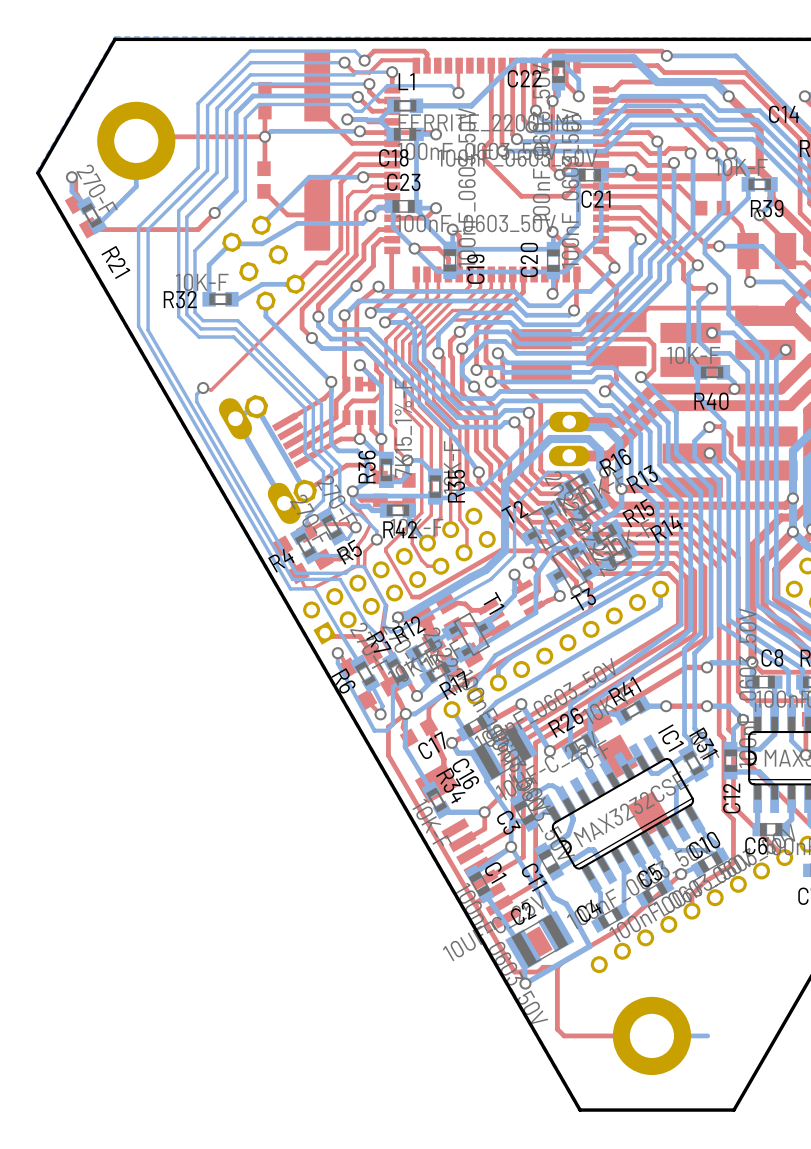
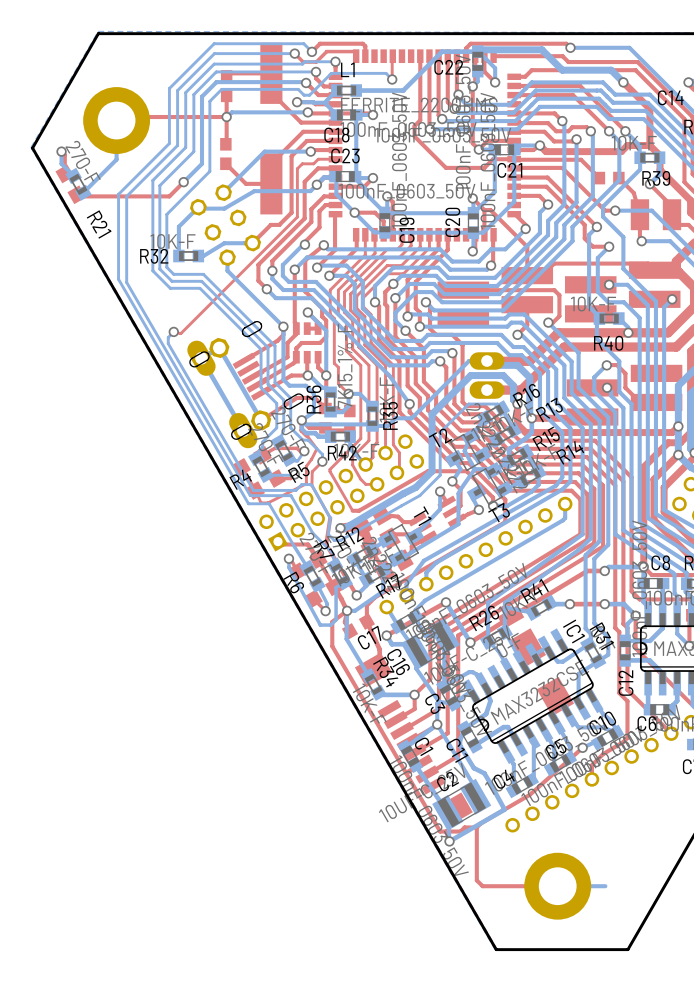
part: none -> (245, 384)
part: (269, 459) -> none

